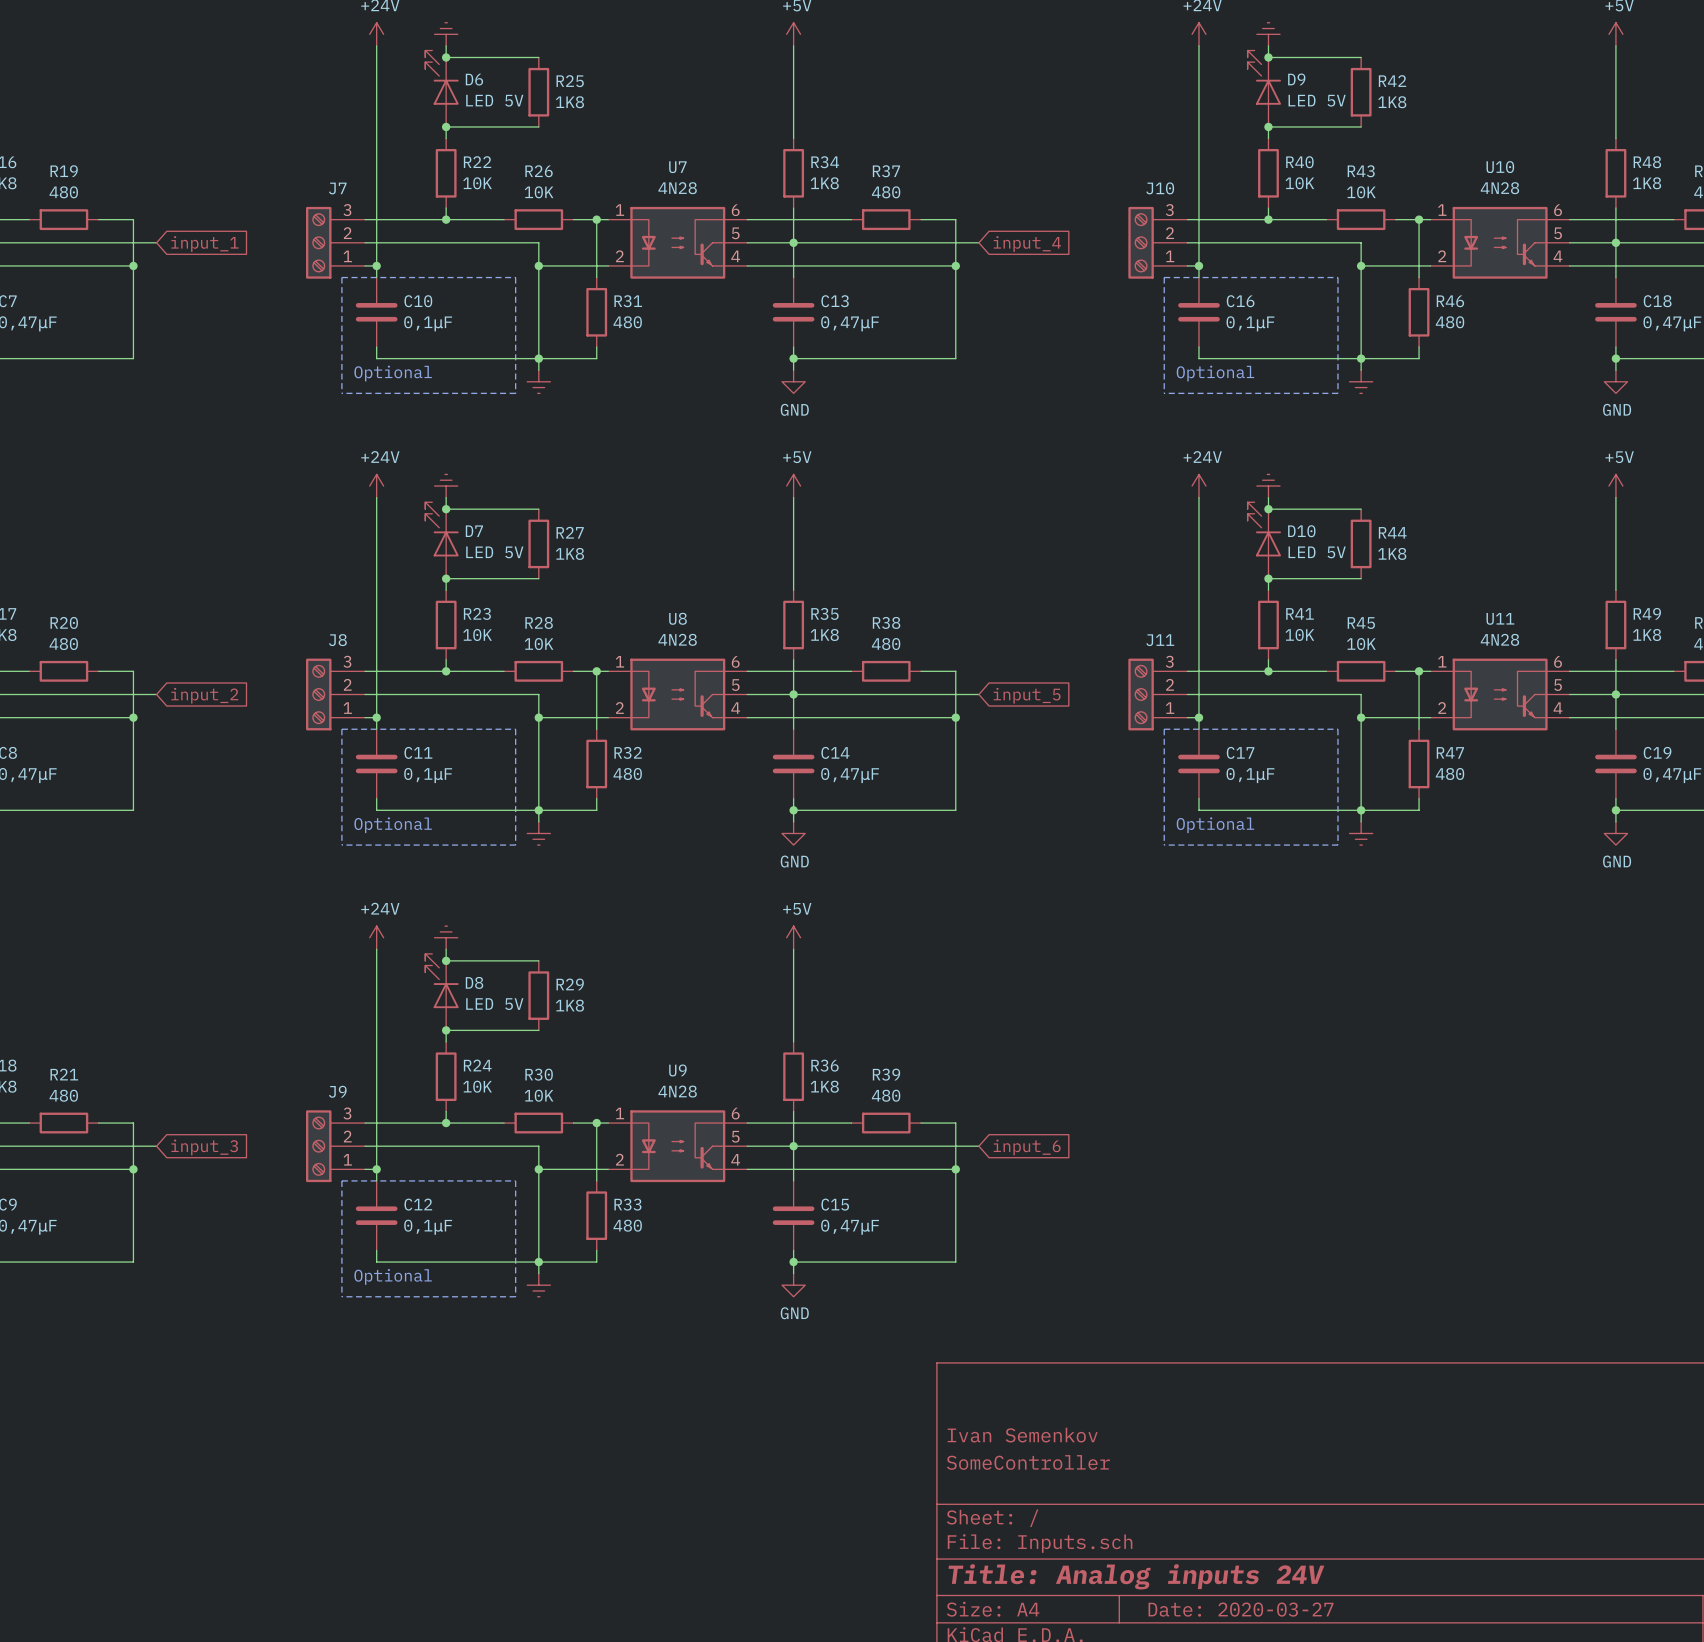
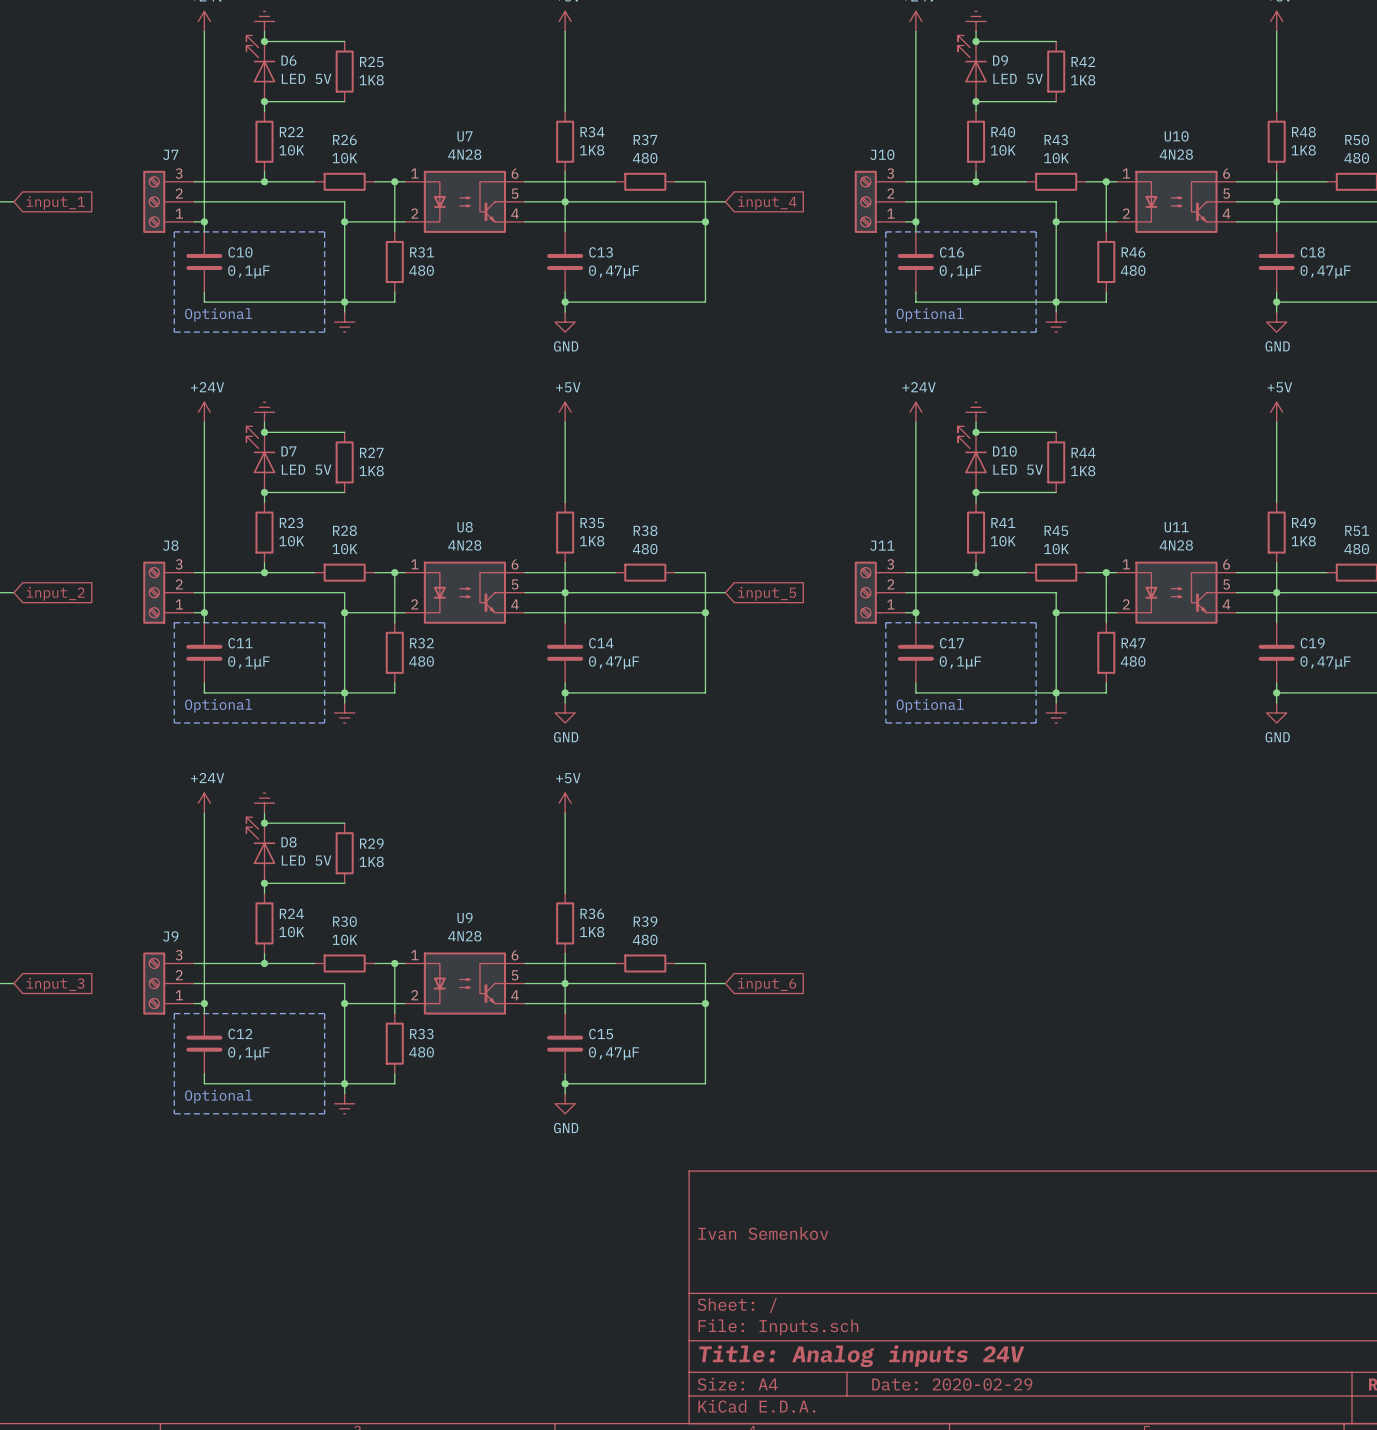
title block: SomeController (1028, 1462) -> none
title block: Date: 2020-03-27 (1240, 1609) -> Date: 2020-02-29 (952, 1384)

